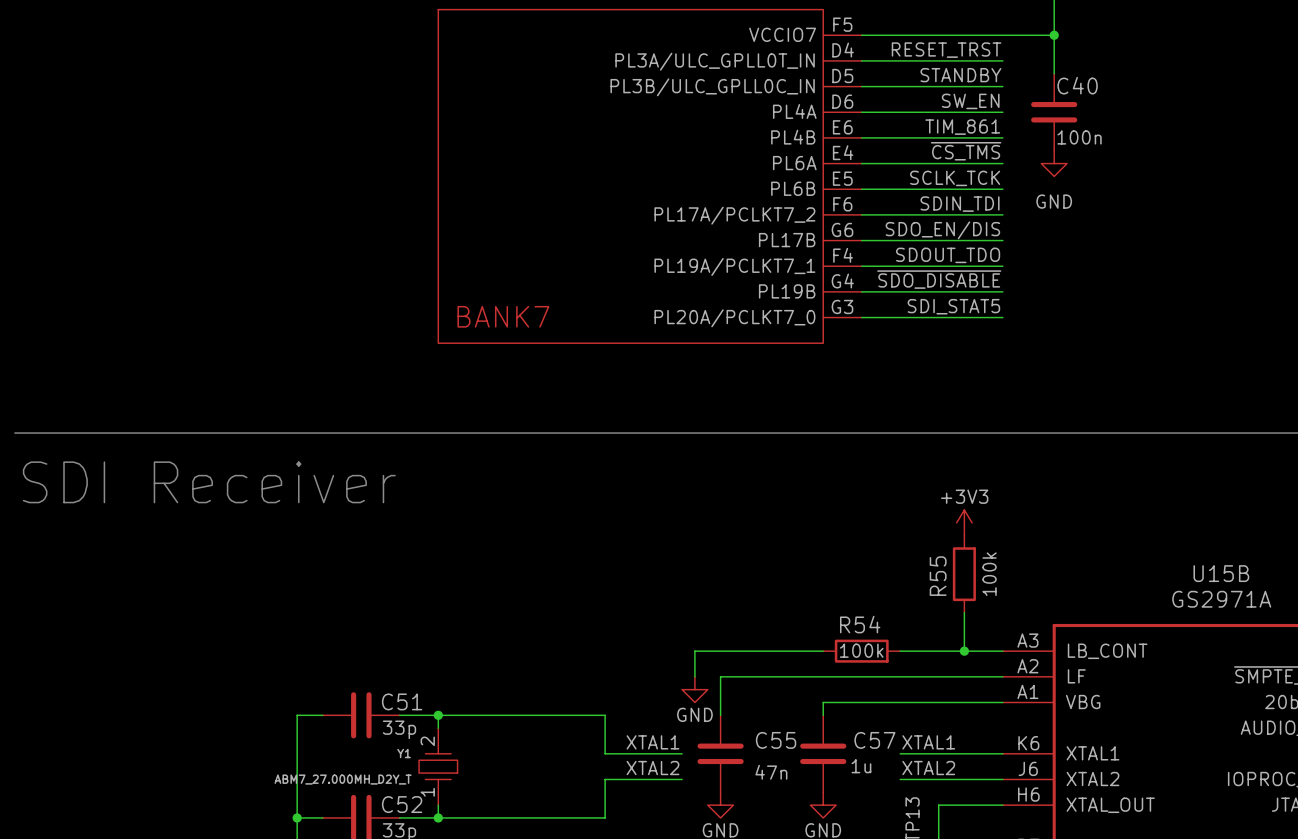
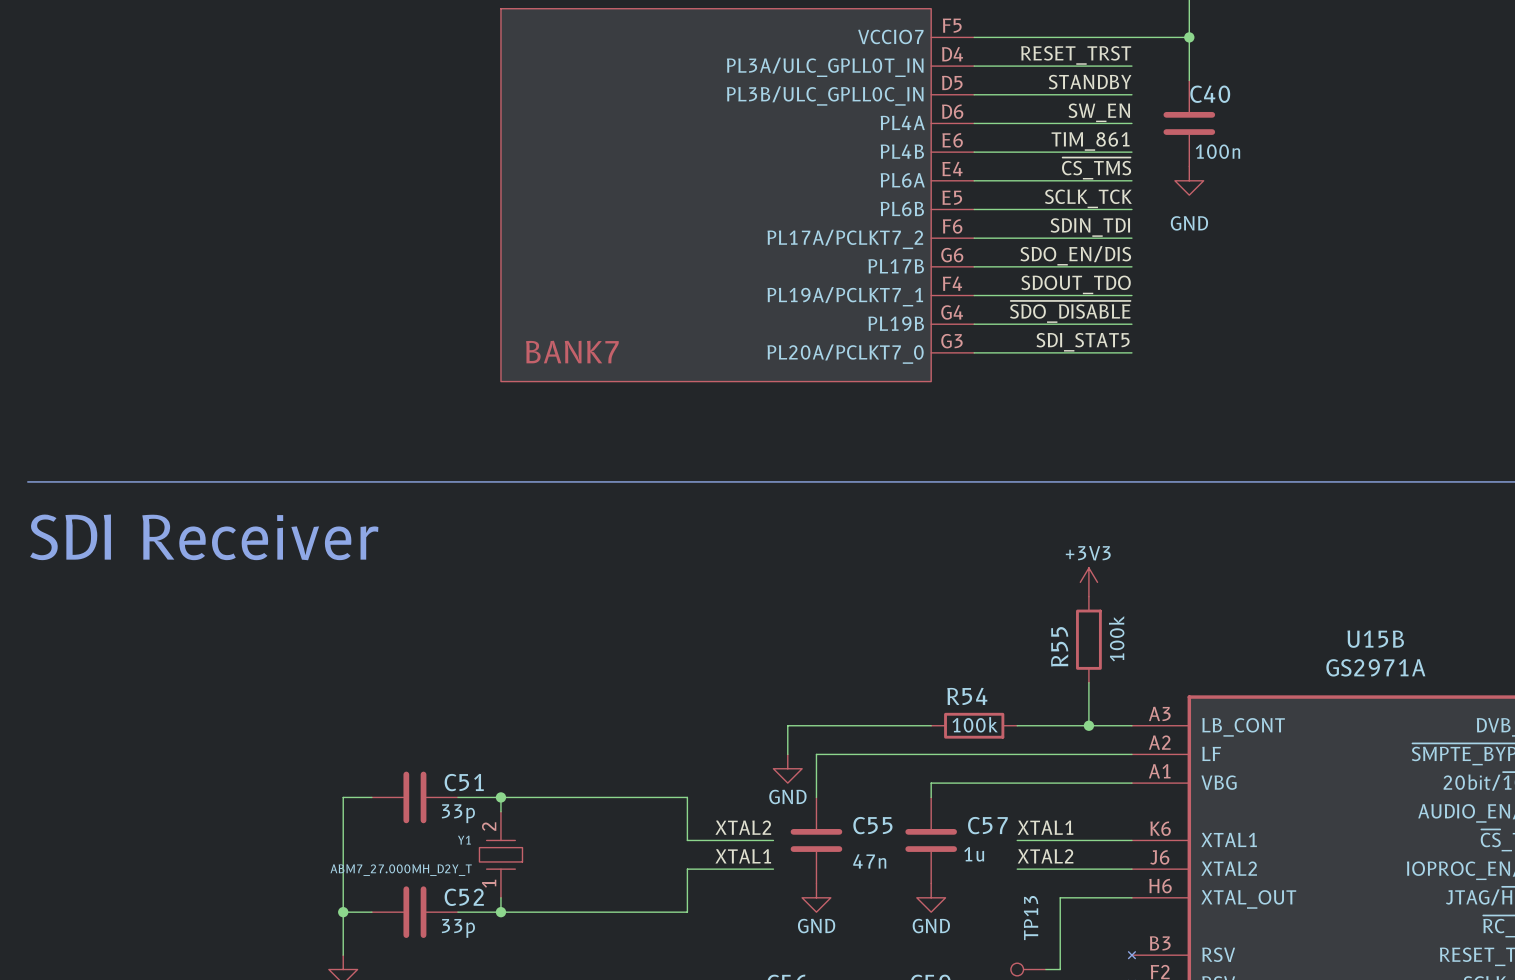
label: XTAL1 (652, 742) -> XTAL2 (743, 827)
label: XTAL2 (652, 768) -> XTAL1 (743, 856)

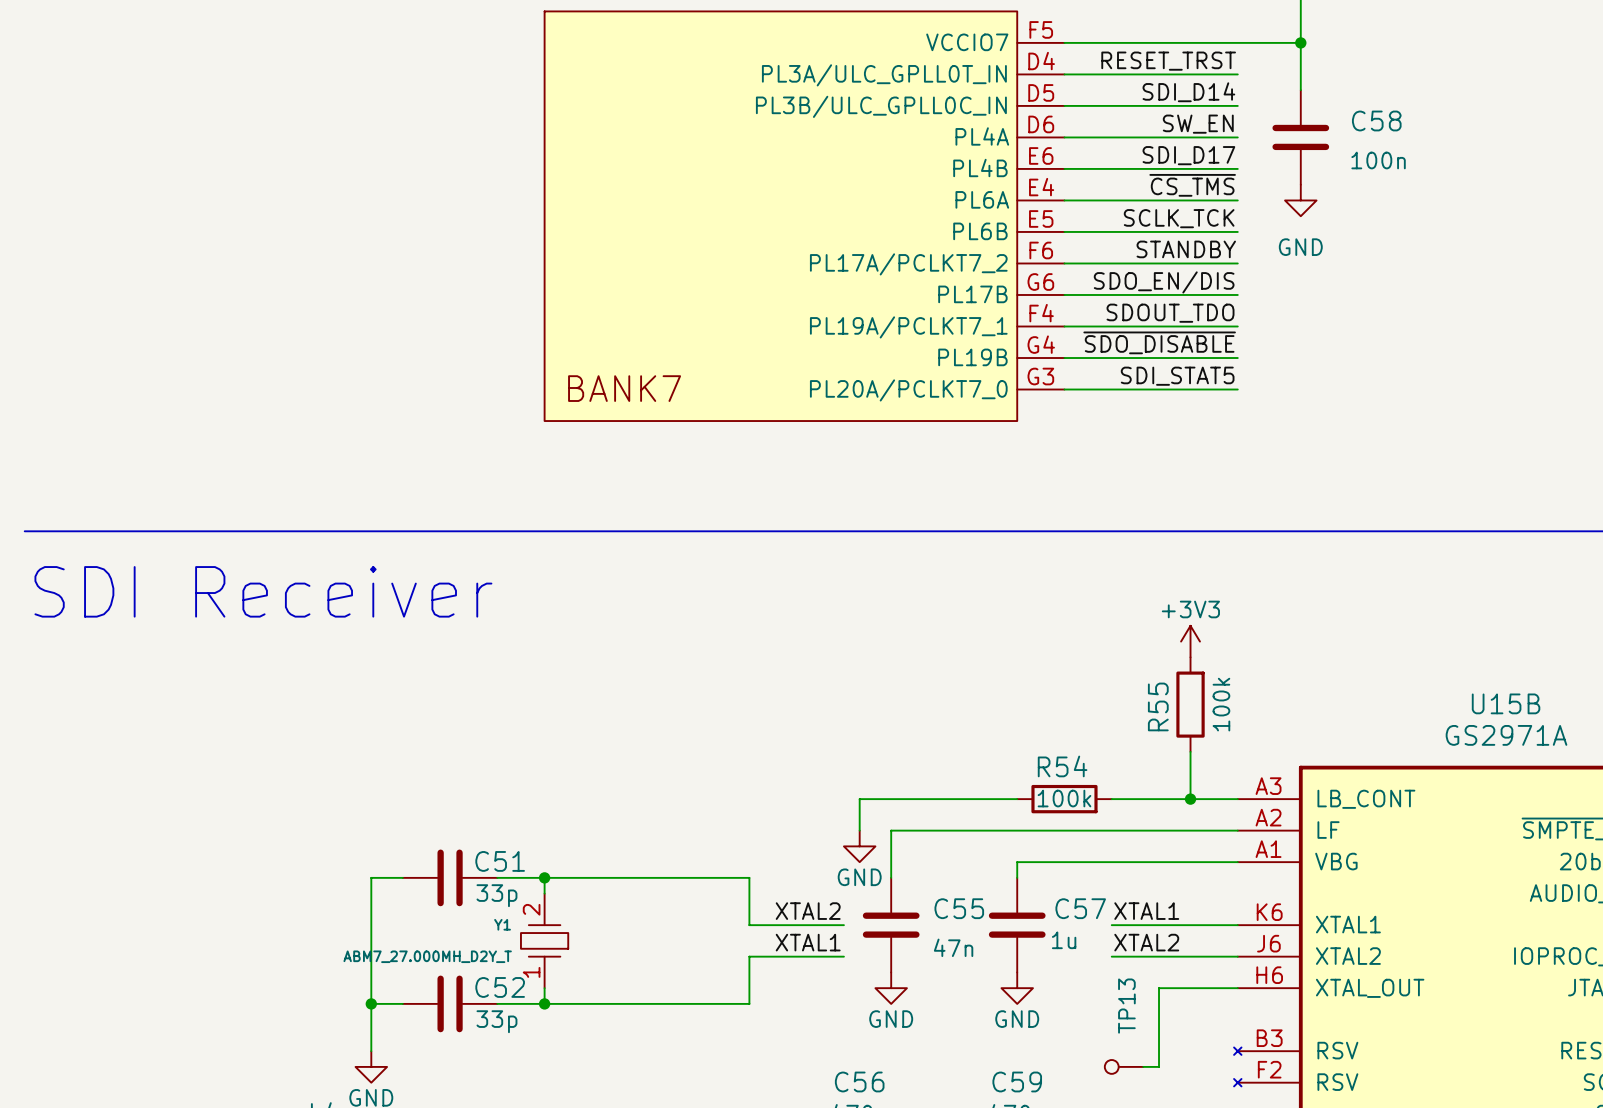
label: STANDBY (1090, 82) -> SDI_D14 (1188, 92)
C40 name: C40 (1210, 94) -> C58 (1376, 120)
label: TIM_861 (1090, 141) -> SDI_D17 (1188, 155)
C40 text position: 100n (1217, 151) -> 100n (1378, 160)
label: SDIN_TDI (1090, 227) -> STANDBY (1186, 249)

